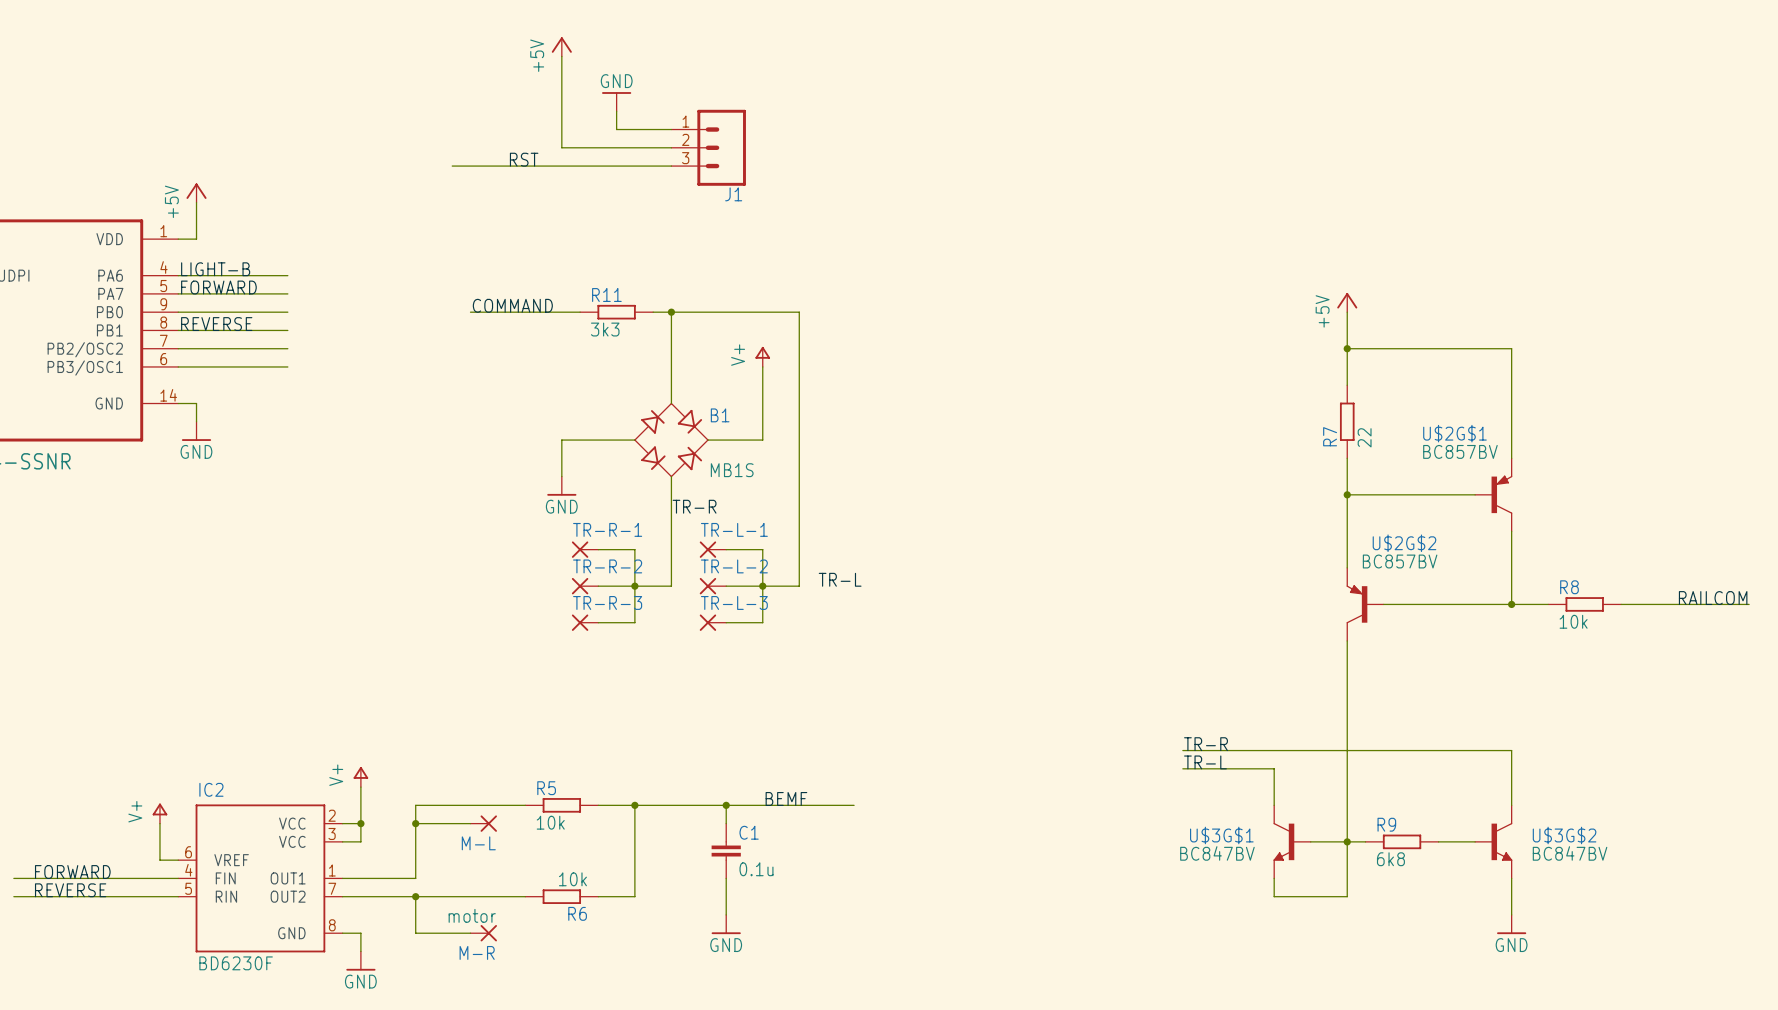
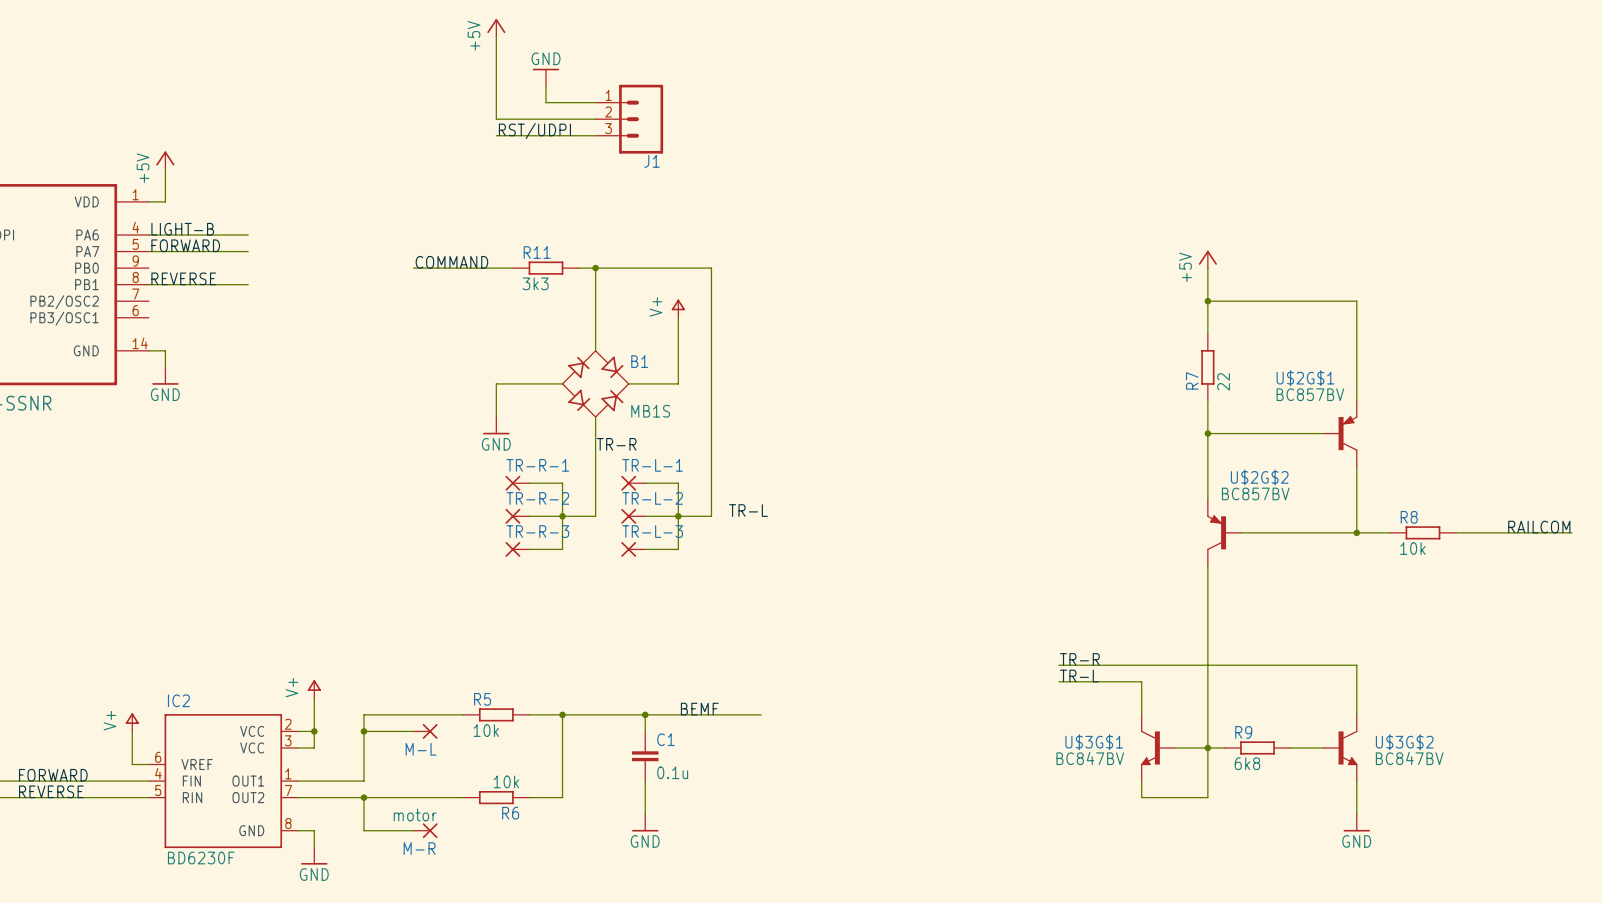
label: RST (524, 159) -> none
label: none -> RST/UDPI (534, 131)
wire: (452, 166) (561, 166) -> none
wire: (178, 312) (287, 312) -> none
wire: (178, 348) (287, 348) -> none
wire: (178, 366) (287, 366) -> none

